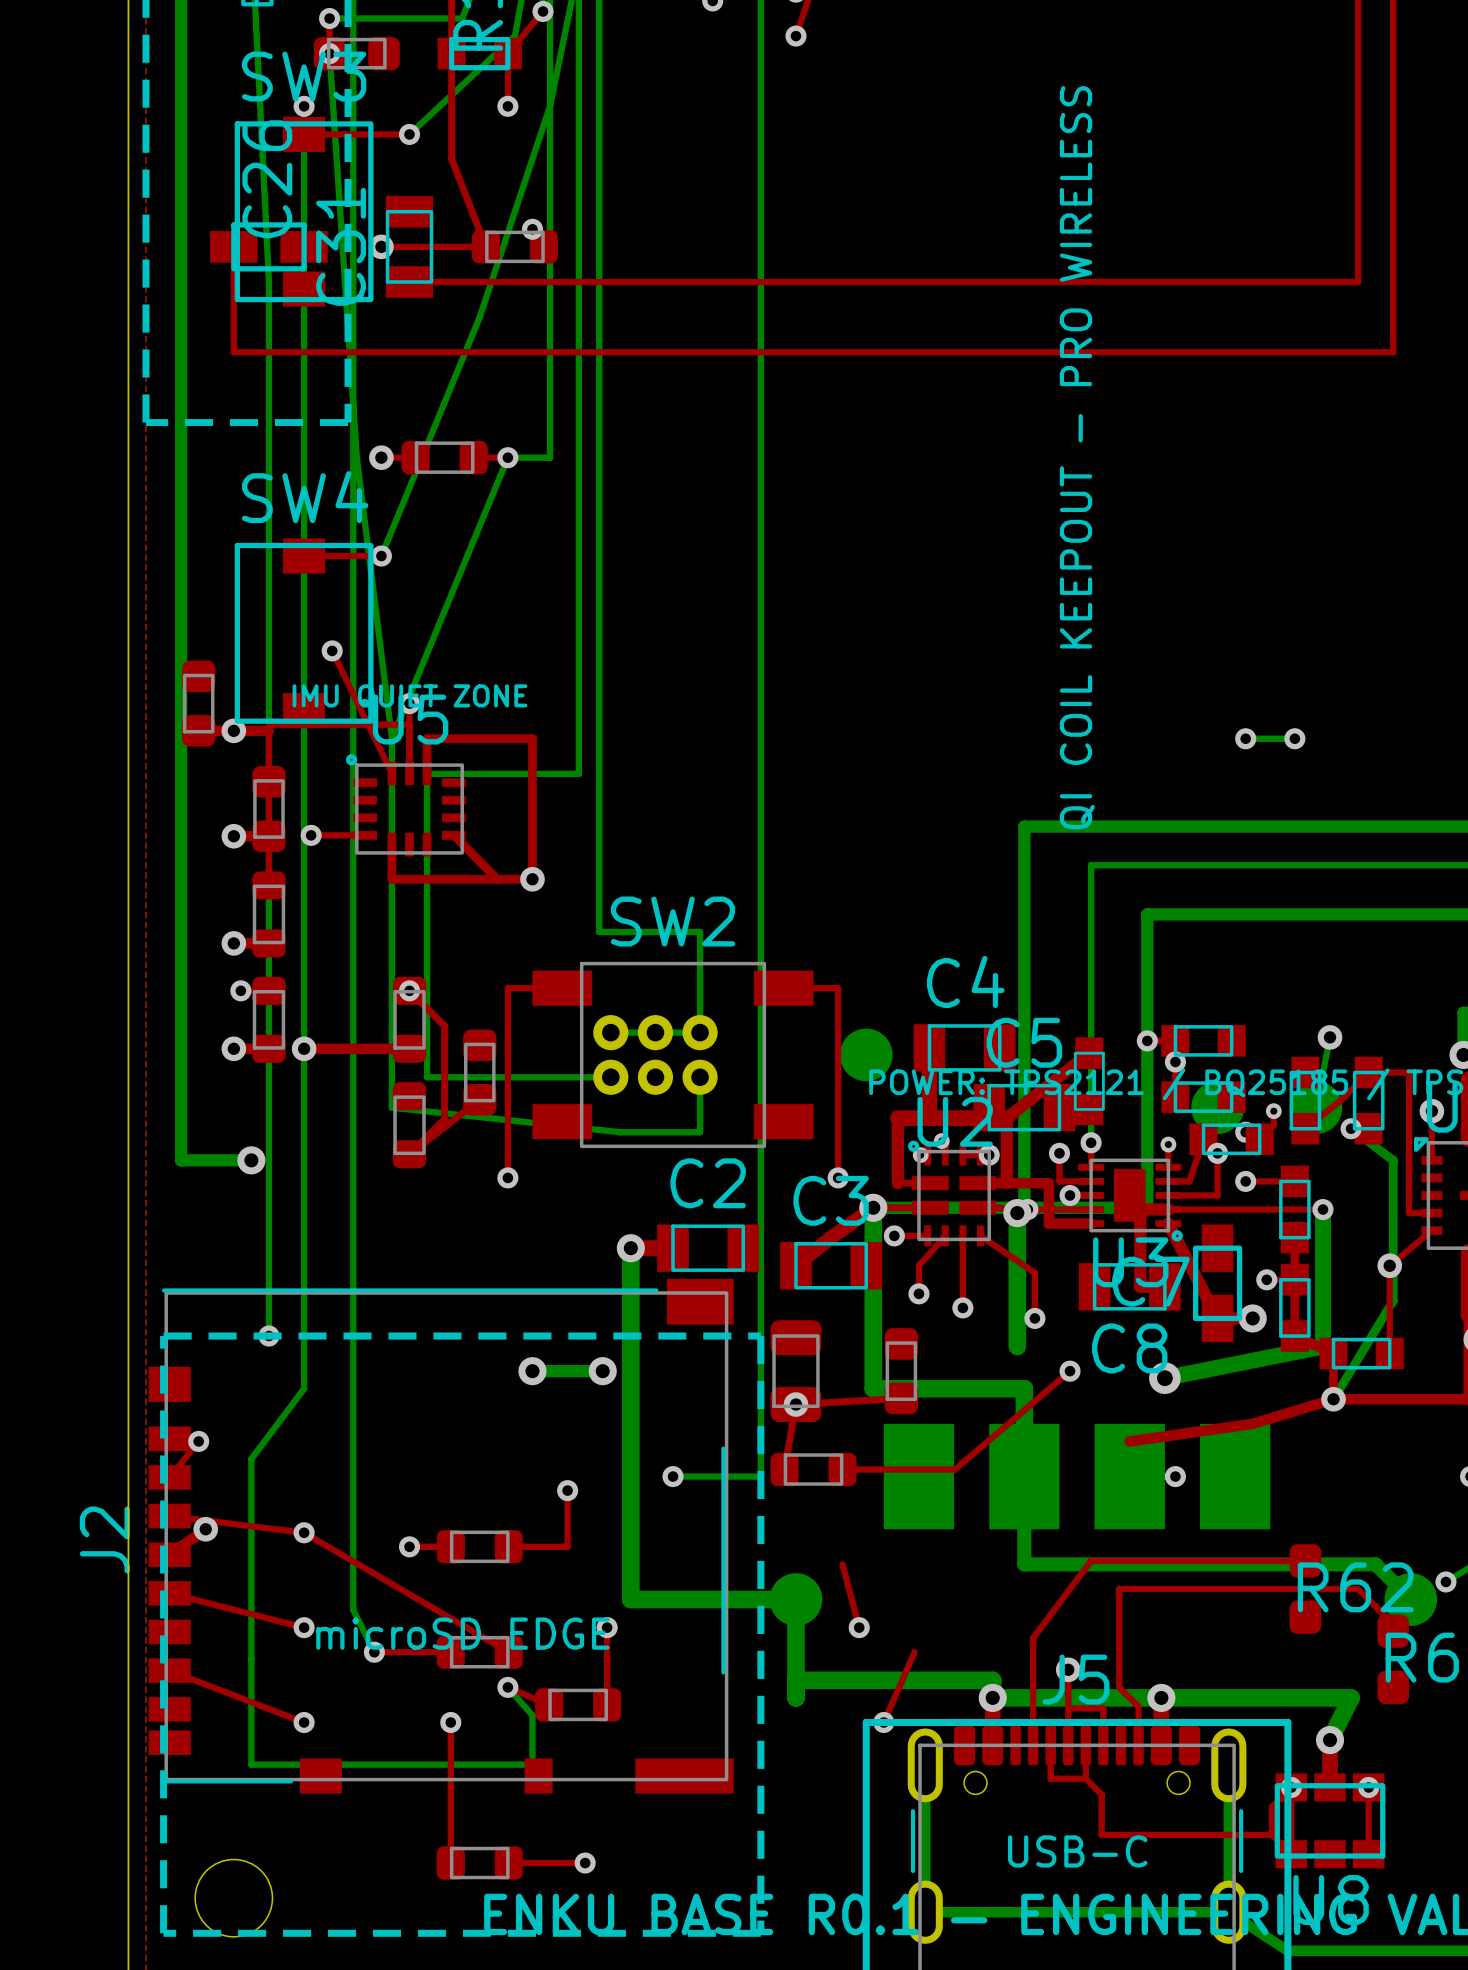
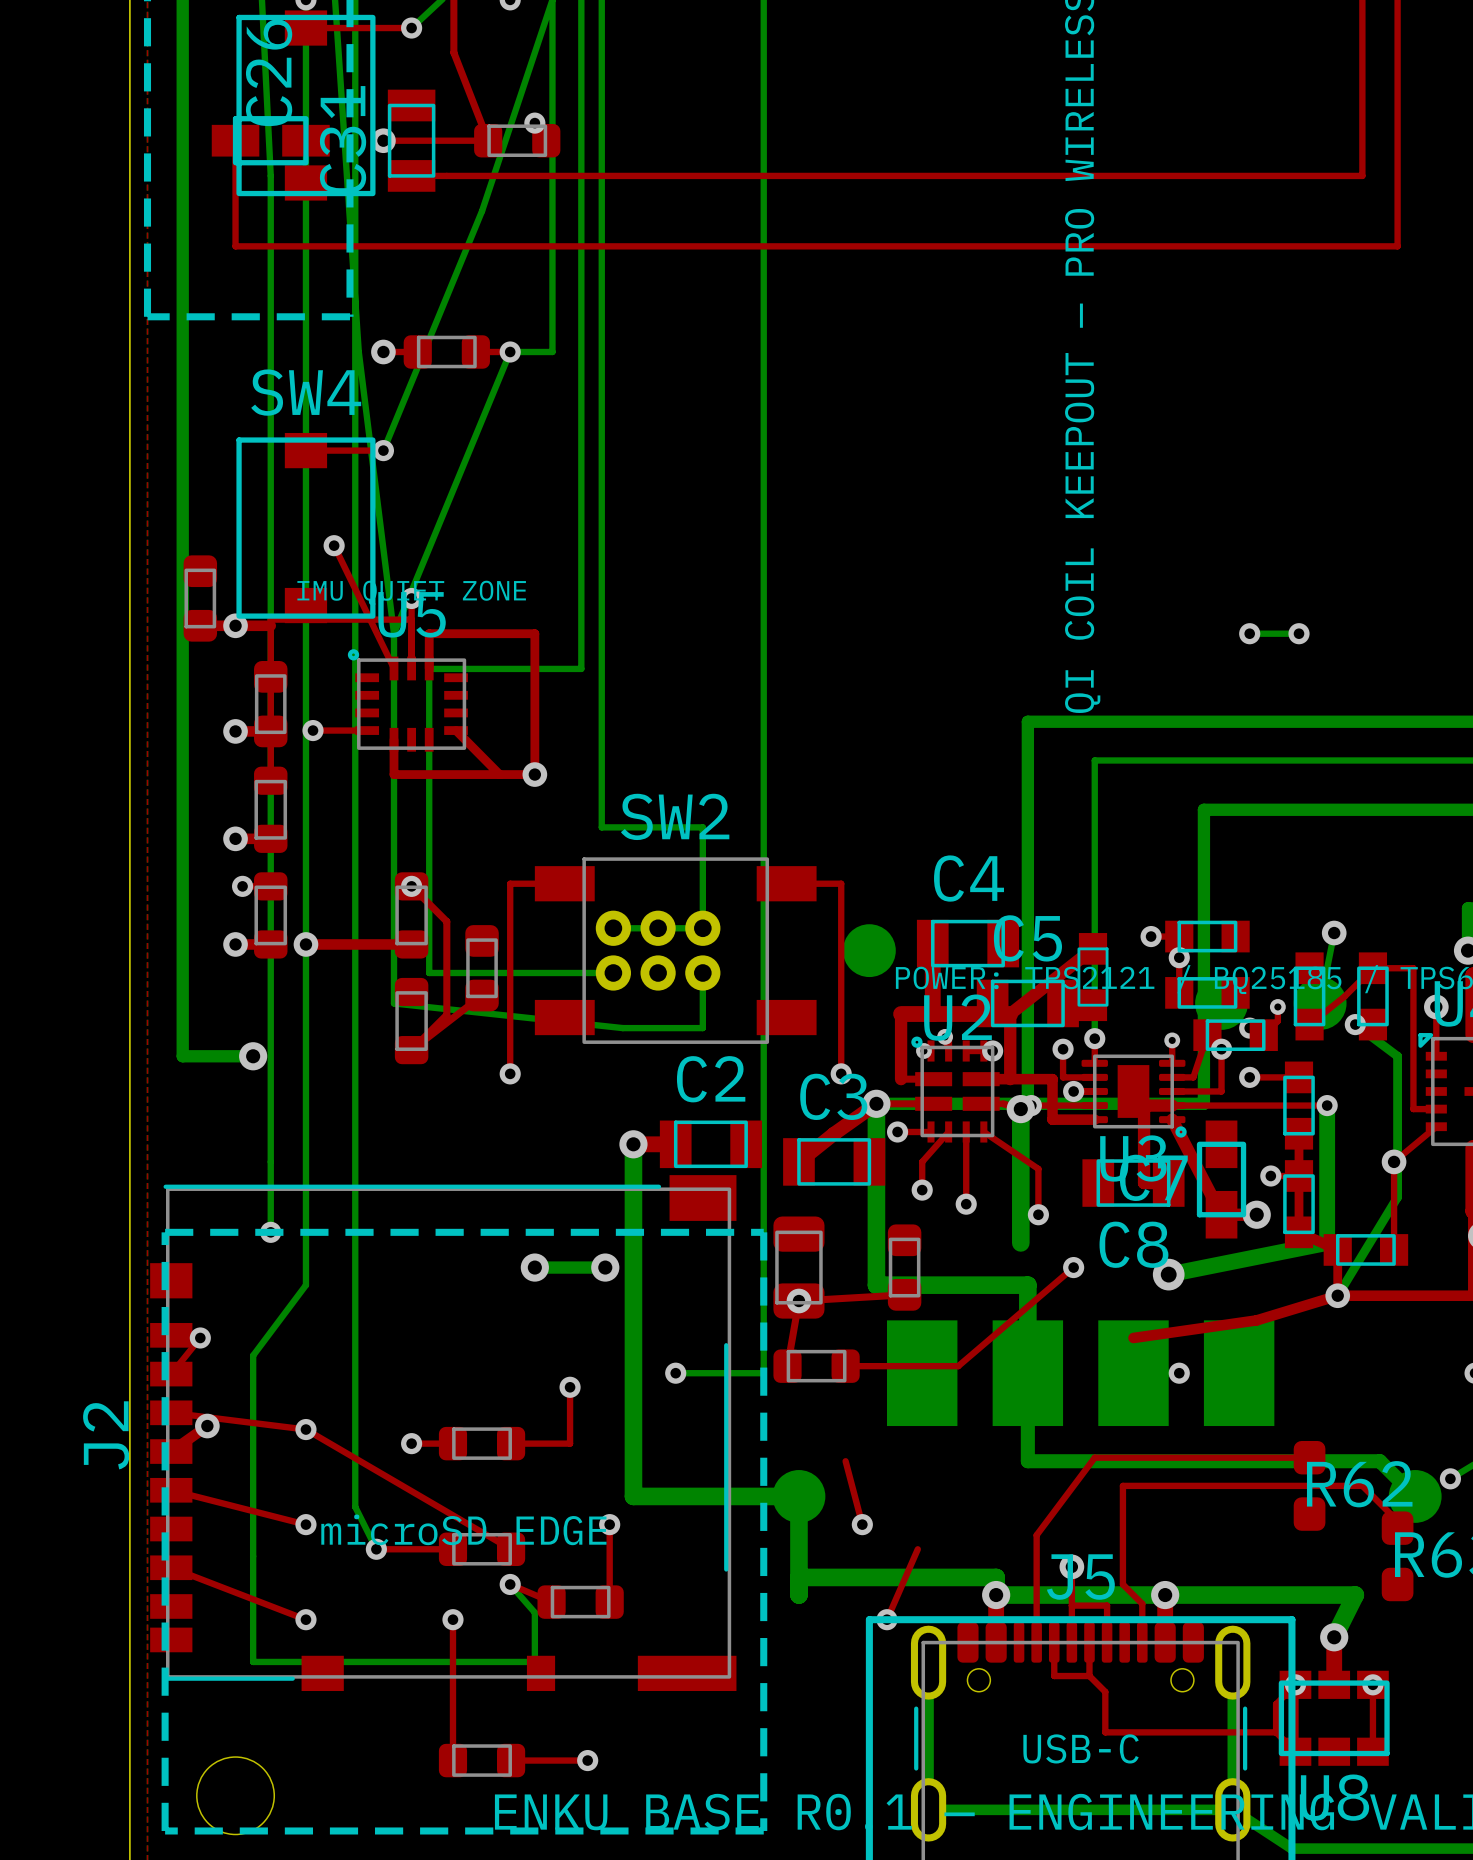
bottom track: (1200, 914) (1147, 914) (1147, 1207) -> (1203, 809) (1203, 1103) (1151, 1103)

